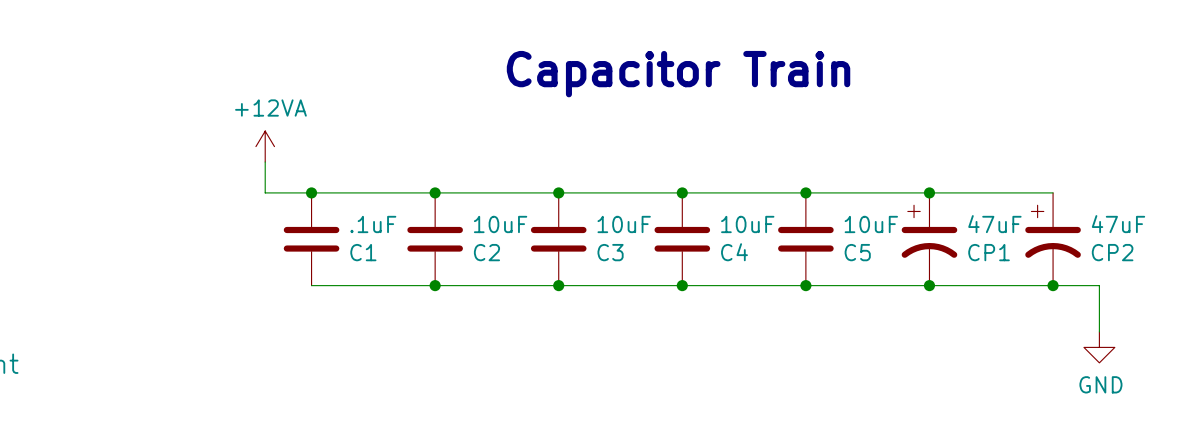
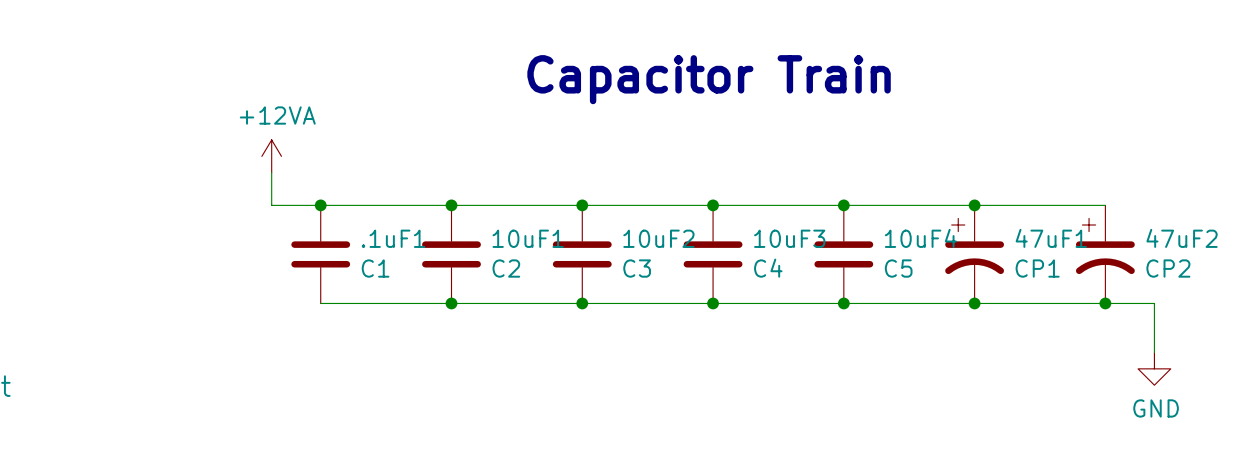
.1uF name: .1uF (373, 224) -> .1uF1 (393, 238)
10uF name: 10uF (500, 224) -> 10uF1 (528, 238)
10uF name: 10uF (624, 224) -> 10uF2 (658, 238)
10uF name: 10uF (747, 224) -> 10uF3 (789, 238)
10uF name: 10uF (871, 224) -> 10uF4 (920, 238)
47uF name: 47uF (994, 224) -> 47uF1 (1051, 238)
47uF name: 47uF (1118, 224) -> 47uF2 (1182, 238)

